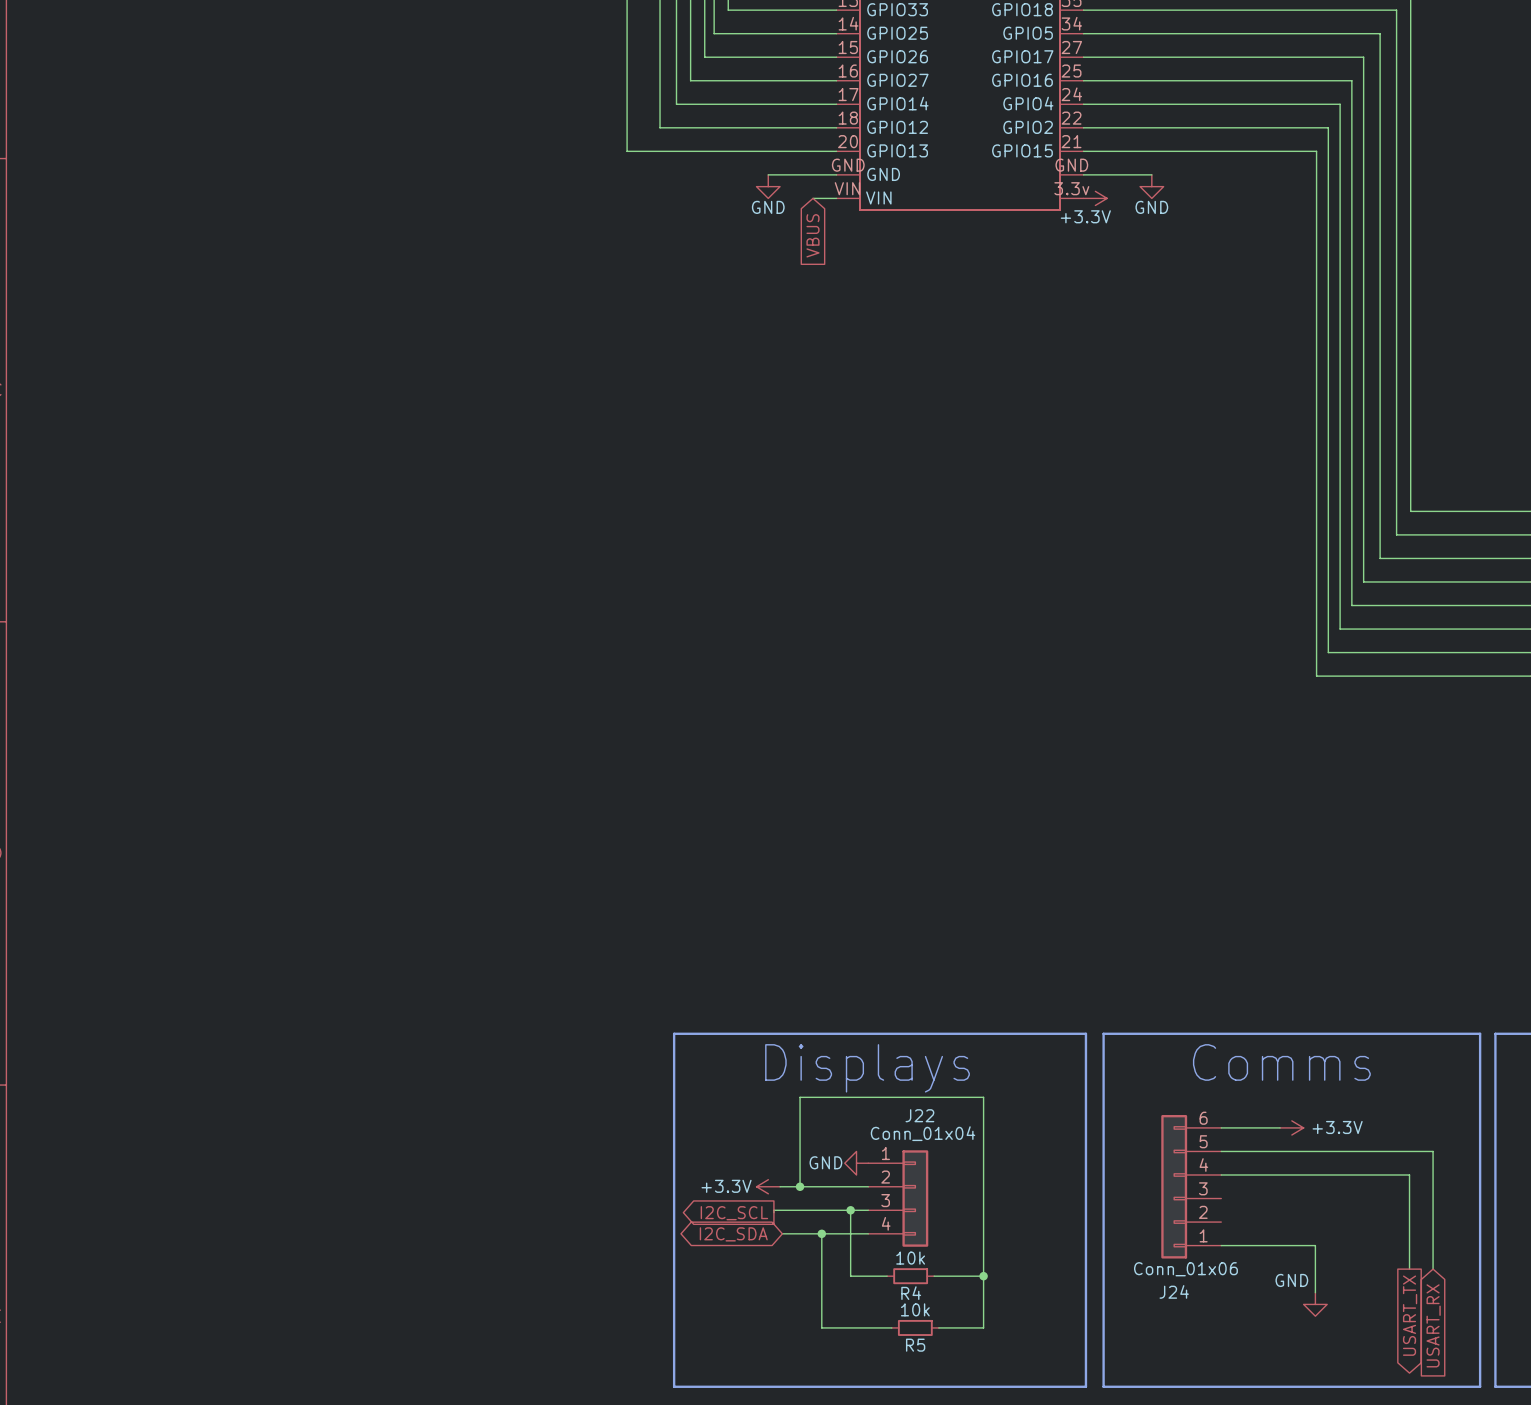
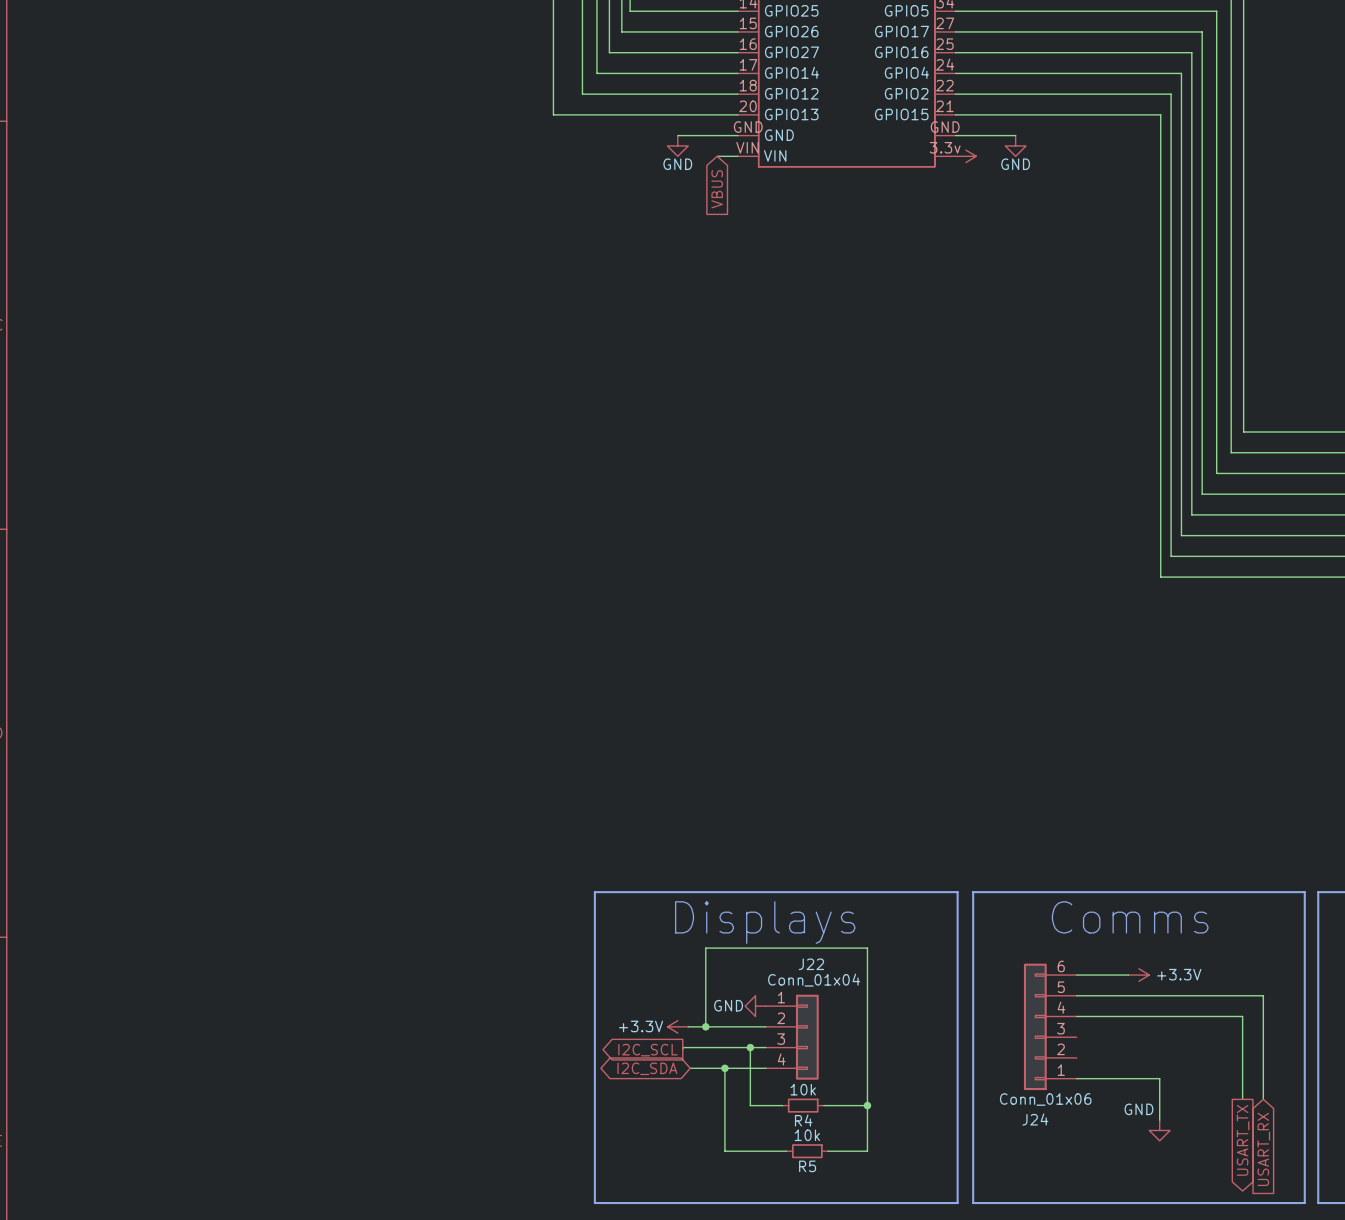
power symbol text: +3.3V (1085, 216) -> none

